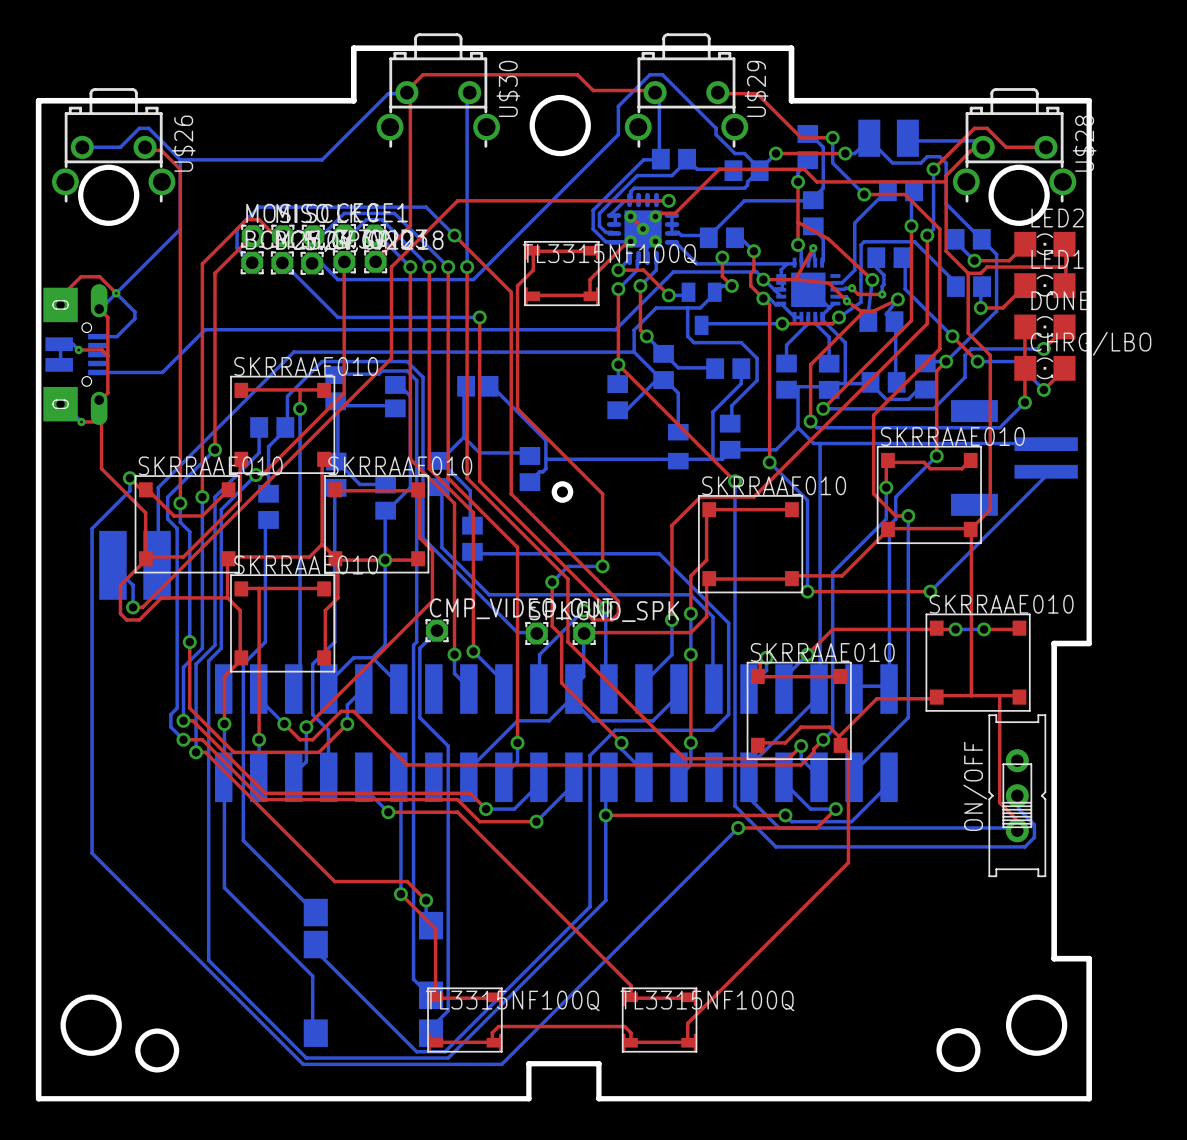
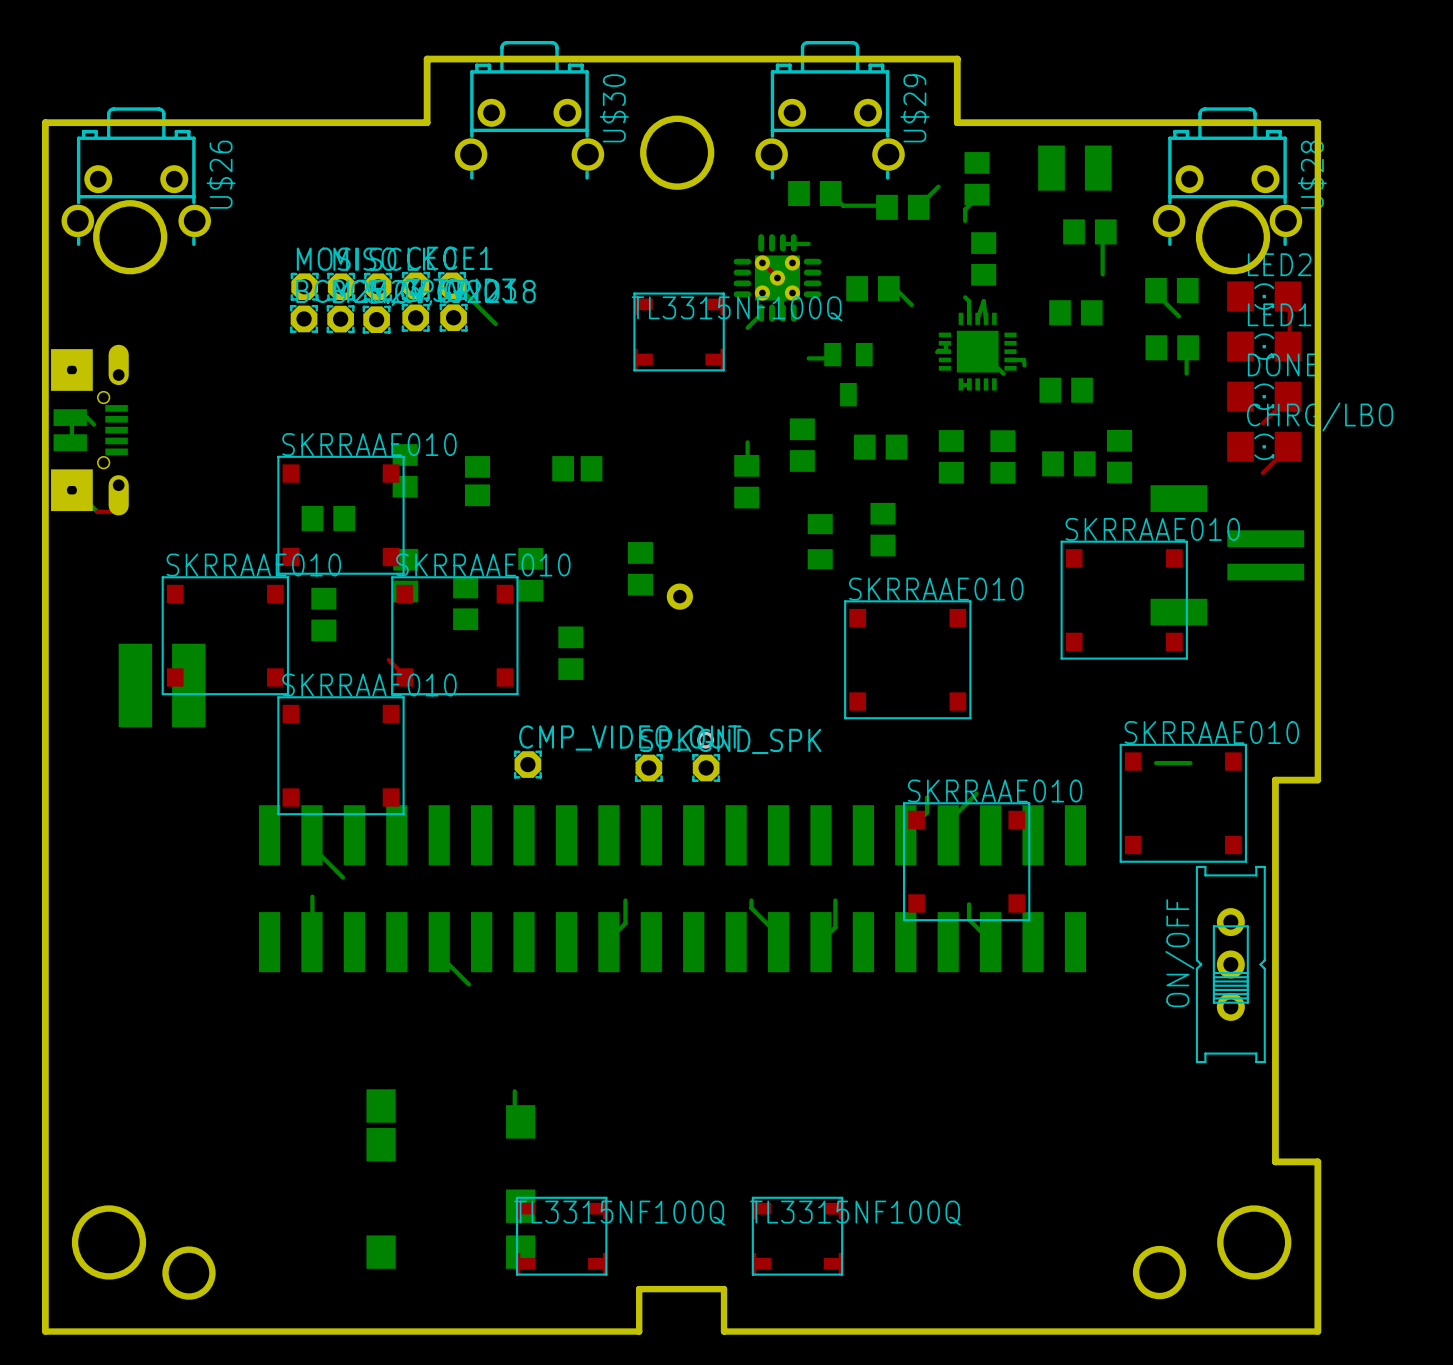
bottom track: (406, 92) (388, 93) (322, 159) (180, 159) -> none
bottom track: (469, 92) (467, 93) (467, 267) -> none
bottom track: (655, 92) (659, 96) (660, 159) (643, 159) (593, 210) (593, 229) (605, 241) (627, 241) (643, 228) -> none
top track: (655, 92) (653, 90) (593, 90) (577, 74) (422, 74) (406, 92) (410, 96) (410, 226) (375, 261) -> none
top track: (717, 92) (757, 93) (801, 137) (832, 137) -> none
bottom track: (807, 133) (823, 147) (823, 188) (813, 200) (744, 200) (708, 237) (706, 235) (671, 233) (671, 213) (656, 213) (643, 228) -> none
bottom track: (832, 137) (832, 163) (864, 194) -> none
via: (832, 137) -> none
bottom track: (907, 138) (908, 140) (974, 140) (983, 147) -> none
bottom track: (82, 147) (120, 147) (139, 128) (148, 128) (180, 159) -> none
top track: (145, 147) (145, 150) (161, 150) (180, 169) (180, 503) -> none
top track: (983, 147) (980, 150) (971, 150) (946, 175) (946, 251) (968, 273) -> none
top track: (1045, 147) (1006, 147) (987, 128) (974, 128) (933, 169) -> none
top track: (775, 153) (845, 153) -> none
via: (775, 153) -> none
bottom track: (845, 153) (854, 153) (869, 138) (892, 163) (920, 163) (927, 156) (939, 156) (946, 163) (946, 203) (996, 254) (996, 311) (946, 361) (927, 361) (925, 363) -> none
via: (845, 153) -> none
bottom track: (180, 159) (180, 229) (99, 309) -> none
bottom track: (687, 159) (671, 175) (637, 175) (599, 213) (599, 226) (605, 232) (614, 233) -> none
bottom track: (933, 169) (933, 229) (927, 235) -> none
via: (933, 169) -> none
top track: (798, 181) (798, 244) -> none
via: (798, 181) -> none
top track: (946, 181) (816, 181) (804, 169) (719, 169) (675, 213) (656, 213) (655, 216) -> none
bottom track: (887, 190) (854, 222) (854, 270) (842, 282) (835, 282) -> none
top track: (864, 194) (905, 194) (939, 229) (939, 348) (873, 415) (873, 493) (895, 515) (908, 515) -> none
via: (864, 194) -> none
top track: (668, 200) (457, 200) (391, 267) (391, 358) (142, 607) (133, 607) -> none
via: (668, 200) -> none
top track: (798, 222) (828, 238) (872, 279) -> none
bottom track: (614, 224) (615, 216) (612, 213) (624, 200) (629, 200) (631, 191) (634, 188) (744, 188) (747, 181) (760, 169) (744, 153) (735, 153) (716, 134) (716, 128) (662, 74) (649, 74) (618, 106) (618, 134) (473, 279) (337, 279) (322, 263) (312, 263) -> none
bottom track: (813, 226) (823, 238) (822, 262) -> none
top track: (911, 226) (911, 320) (823, 408) -> none
via: (911, 226) -> none
bottom track: (344, 235) (347, 232) (353, 232) (366, 219) (382, 219) (429, 267) -> none
bottom track: (454, 235) (426, 207) (259, 207) (237, 229) (237, 248) (252, 262) -> none
top track: (454, 235) (511, 292) (511, 493) (618, 601) (618, 613) (612, 619) (593, 619) (583, 610) -> none
via: (454, 235) -> none
top track: (927, 235) (927, 323) (753, 497) (700, 497) (671, 525) (671, 619) -> none
via: (927, 235) -> none
top track: (252, 236) (214, 273) (214, 449) -> none
top track: (282, 236) (274, 235) (259, 219) (246, 219) (202, 263) (202, 497) -> none
bottom track: (313, 236) (322, 235) (344, 213) (394, 213) (448, 267) -> none
top track: (630, 241) (627, 241) (590, 279) (589, 296) (533, 296) -> none
bottom track: (671, 242) (675, 241) (697, 263) (794, 262) -> none
via: (798, 244) -> none
top track: (1025, 244) (1009, 260) (974, 260) -> none
top track: (813, 248) (795, 279) -> none
via: (813, 248) -> none
top track: (589, 250) (533, 251) (533, 270) (517, 285) (517, 408) (602, 493) (602, 566) -> none
top track: (753, 251) (753, 270) (750, 273) (750, 285) (769, 304) (769, 462) -> none
via: (753, 251) -> none
bottom track: (638, 257) (637, 270) (618, 289) -> none
bottom track: (656, 257) (656, 270) (640, 285) -> none
top track: (722, 257) (722, 276) (731, 285) -> none
via: (722, 257) -> none
bottom track: (876, 257) (876, 267) (883, 275) (882, 294) -> none
bottom track: (902, 257) (905, 260) (905, 289) (952, 336) -> none
via: (974, 260) -> none
top track: (344, 261) (344, 393) (262, 475) (255, 475) -> none
bottom track: (282, 262) (337, 317) (479, 317) -> none
bottom track: (787, 263) (781, 269) (781, 275) -> none
top track: (410, 267) (410, 459) (454, 503) (454, 654) -> none
via: (410, 267) -> none
top track: (429, 267) (429, 468) (473, 512) (473, 651) -> none
via: (429, 267) -> none
top track: (448, 267) (448, 478) (517, 547) (517, 742) -> none
via: (448, 267) -> none
top track: (467, 267) (467, 478) (567, 579) (567, 642) (684, 758) (788, 758) (801, 746) -> none
via: (467, 267) -> none
top track: (1065, 267) (987, 267) (980, 273) (968, 273) -> none
top track: (618, 270) (643, 270) (668, 295) -> none
via: (618, 270) -> none
top track: (968, 273) (968, 333) (990, 355) (990, 509) (970, 529) -> none
top track: (763, 279) (795, 279) -> none
via: (763, 279) -> none
top track: (795, 279) (828, 283) (846, 301) (861, 311) (873, 311) (897, 299) -> none
bottom track: (872, 279) (868, 321) -> none
via: (872, 279) -> none
top track: (640, 285) (640, 330) (646, 336) -> none
via: (640, 285) -> none
bottom track: (731, 285) (722, 285) (700, 307) (656, 307) (634, 330) (634, 352) -> none
via: (731, 285) -> none
top track: (1025, 285) (1002, 307) (980, 307) -> none
bottom track: (955, 286) (958, 285) (914, 241) (864, 241) (861, 244) (860, 302) (839, 317) -> none
bottom track: (852, 288) (835, 289) -> none
top track: (852, 288) (858, 294) (882, 294) -> none
via: (852, 288) -> none
top track: (618, 289) (618, 364) (735, 481) -> none
via: (618, 289) -> none
bottom track: (116, 293) (134, 311) (134, 318) (116, 336) (97, 336) -> none
top track: (116, 293) (99, 276) (80, 276) (60, 297) (60, 304) -> none
via: (116, 293) -> none
via: (882, 294) -> none
via: (668, 295) -> none
bottom track: (781, 296) (756, 271) (673, 271) (615, 329) (205, 329) (162, 372) (97, 372) -> none
bottom track: (763, 298) (769, 298) (775, 304) (781, 303) (794, 316) -> none
via: (763, 298) -> none
bottom track: (897, 299) (886, 314) (895, 323) (896, 382) -> none
via: (897, 299) -> none
via: (846, 301) -> none
bottom track: (835, 303) (822, 316) (823, 320) (845, 342) (845, 383) -> none
bottom track: (687, 307) (687, 336) (694, 342) (741, 342) (757, 358) (757, 380) (731, 405) (730, 423) -> none
via: (980, 307) -> none
top track: (99, 309) (107, 317) (107, 393) (99, 400) (101, 402) (101, 468) (145, 512) (145, 558) -> none
top track: (864, 311) (810, 364) (810, 421) -> none
bottom track: (808, 316) (807, 323) (786, 345) (786, 363) -> none
bottom track: (815, 316) (815, 323) (829, 337) (829, 363) -> none
top track: (479, 317) (479, 481) (605, 607) -> none
via: (479, 317) -> none
top track: (839, 317) (832, 323) (782, 323) -> none
via: (839, 317) -> none
bottom track: (782, 323) (703, 323) (701, 325) -> none
via: (782, 323) -> none
top track: (1025, 326) (1024, 402) -> none
bottom track: (646, 336) (678, 367) (715, 368) -> none
via: (646, 336) -> none
top track: (952, 336) (977, 361) -> none
via: (952, 336) -> none
bottom track: (1043, 348) (971, 348) (965, 355) (965, 377) (933, 408) (823, 408) -> none
via: (1043, 348) -> none
top track: (78, 350) (102, 350) (107, 355) -> none
via: (78, 350) -> none
bottom track: (634, 352) (663, 380) -> none
bottom track: (634, 352) (293, 352) (158, 487) (157, 565) -> none
top track: (946, 361) (936, 371) (936, 456) -> none
via: (946, 361) -> none
bottom track: (977, 361) (1015, 361) (1043, 389) -> none
via: (977, 361) -> none
via: (618, 364) -> none
bottom track: (741, 368) (741, 383) (712, 411) (712, 459) -> none
bottom track: (335, 375) (378, 374) (382, 371) (407, 371) (416, 380) (416, 642) (413, 645) (413, 979) (431, 995) -> none
bottom track: (663, 380) (678, 393) (678, 432) -> none
bottom track: (663, 380) (659, 377) (627, 408) (617, 410) -> none
bottom track: (395, 384) (397, 383) (410, 396) (410, 487) (385, 510) (385, 645) (372, 657) -> none
bottom track: (466, 386) (463, 386) (463, 437) -> none
bottom track: (489, 386) (492, 386) (545, 440) (545, 468) (539, 471) (529, 482) -> none
bottom track: (798, 386) (798, 427) -> none
top track: (300, 389) (300, 408) -> none
bottom track: (925, 389) (917, 389) (908, 399) (886, 399) (870, 382) (832, 383) (829, 389) (826, 386) (788, 386) (786, 389) -> none
via: (1043, 389) -> none
top track: (241, 390) (324, 390) -> none
bottom track: (1024, 402) (999, 427) (816, 427) (810, 421) -> none
via: (1024, 402) -> none
bottom track: (300, 408) (300, 679) (293, 686) (293, 689) -> none
via: (300, 408) -> none
bottom track: (395, 408) (394, 405) (337, 405) (335, 401) (337, 402) (337, 459) (336, 461) (359, 484) (385, 484) -> none
via: (823, 408) -> none
via: (81, 421) -> none
via: (810, 421) -> none
bottom track: (259, 427) (259, 452) (214, 497) (214, 645) (196, 664) (196, 752) -> none
bottom track: (798, 427) (813, 443) (1046, 444) -> none
bottom track: (798, 427) (775, 449) (730, 449) (722, 459) (681, 459) (678, 461) (678, 459) (545, 459) -> none
bottom track: (463, 437) (439, 460) (470, 490) (470, 525) (472, 525) -> none
bottom track: (463, 437) (479, 452) (526, 452) (529, 455) -> none
bottom track: (820, 443) (820, 686) (816, 689) (816, 698) (750, 764) (748, 777) (750, 777) (750, 799) (779, 827) (1015, 827) (1017, 830) -> none
bottom track: (214, 449) (167, 497) (167, 519) (177, 528) (177, 708) (170, 714) (170, 727) (183, 739) -> none
via: (214, 449) -> none
bottom track: (936, 456) (895, 497) (895, 519) (889, 525) (889, 689) (886, 686) (854, 686) (854, 689) -> none
via: (936, 456) -> none
top track: (241, 459) (240, 500) (183, 556) (148, 556) (145, 558) -> none
top track: (324, 459) (322, 462) (322, 544) (309, 556) (230, 556) (227, 560) (227, 597) -> none
top track: (970, 460) (961, 468) (930, 468) (924, 462) (889, 462) (887, 460) (886, 462) (886, 487) -> none
bottom track: (769, 462) (807, 500) (807, 591) -> none
via: (769, 462) -> none
bottom track: (1046, 471) (1043, 471) (1043, 478) (930, 591) -> none
bottom track: (255, 475) (221, 509) (221, 648) (208, 660) (208, 960) (306, 1058) (448, 1058) (605, 900) (605, 777) (608, 777) -> none
via: (255, 475) -> none
bottom track: (129, 478) (129, 490) (92, 528) (92, 853) (303, 1064) (501, 1064) (738, 827) -> none
top track: (129, 478) (139, 487) (145, 487) (174, 515) (202, 515) (228, 489) -> none
via: (129, 478) -> none
bottom track: (735, 481) (735, 805) (775, 846) (1024, 846) (1034, 837) (1034, 824) (1018, 809) (1017, 795) -> none
via: (735, 481) -> none
bottom track: (336, 487) (334, 642) (312, 664) (312, 714) (328, 730) (328, 777) -> none
bottom track: (439, 487) (441, 487) (441, 547) (489, 594) (690, 594) (712, 616) (713, 689) -> none
bottom track: (886, 487) (886, 519) (832, 572) (832, 730) (823, 739) -> none
via: (886, 487) -> none
top track: (335, 489) (419, 490) (419, 538) (432, 550) (432, 601) (306, 727) -> none
bottom track: (268, 493) (268, 446) (287, 427) (285, 427) (287, 424) (287, 396) (322, 361) (407, 361) (422, 377) (422, 538) (517, 632) (536, 633) -> none
bottom track: (202, 497) (202, 648) (183, 667) (183, 720) -> none
via: (202, 497) -> none
bottom track: (180, 503) (180, 522) (189, 531) (189, 642) -> none
via: (180, 503) -> none
top track: (791, 509) (709, 509) (706, 512) (706, 560) (690, 575) (690, 613) -> none
bottom track: (908, 515) (908, 717) (851, 774) (854, 777) -> none
via: (908, 515) -> none
bottom track: (268, 519) (265, 522) (265, 642) (243, 664) (243, 840) (315, 912) -> none
top track: (970, 529) (889, 528) (842, 575) (794, 575) (791, 579) (706, 579) (706, 616) (690, 632) (584, 633) -> none
top track: (970, 529) (971, 695) -> none
bottom track: (472, 551) (473, 553) (659, 553) (728, 623) (728, 714) (712, 730) (615, 730) (590, 755) (590, 906) (445, 1051) (416, 1051) (315, 950) (315, 944) -> none
top track: (145, 558) (120, 585) (120, 613) (126, 619) (139, 619) (161, 597) (227, 597) -> none
top track: (418, 558) (337, 560) (337, 597) (325, 610) (324, 657) -> none
via: (385, 560) -> none
bottom track: (112, 565) (133, 585) (133, 607) -> none
bottom track: (602, 566) (567, 566) (552, 582) -> none
via: (602, 566) -> none
top track: (552, 582) (552, 626) (561, 635) (561, 683) (621, 742) -> none
via: (552, 582) -> none
top track: (241, 588) (324, 588) -> none
top track: (259, 588) (259, 739) -> none
top track: (807, 591) (930, 591) -> none
via: (807, 591) -> none
via: (930, 591) -> none
top track: (227, 597) (240, 610) (241, 657) (224, 676) (224, 723) -> none
via: (133, 607) -> none
bottom track: (605, 607) (605, 686) (608, 689) -> none
via: (605, 607) -> none
bottom track: (583, 610) (539, 654) (538, 689) -> none
bottom track: (690, 613) (690, 654) -> none
via: (690, 613) -> none
bottom track: (671, 619) (671, 654) (646, 679) (646, 686) (643, 689) -> none
via: (671, 619) -> none
top track: (1019, 628) (983, 629) -> none
top track: (955, 629) (832, 629) (807, 654) -> none
via: (955, 629) -> none
via: (983, 629) -> none
bottom track: (437, 630) (419, 648) (419, 717) (448, 746) (448, 1010) (432, 1026) (431, 1033) -> none
bottom track: (584, 633) (583, 676) (574, 686) (573, 689) -> none
top track: (189, 642) (189, 708) (233, 752) (318, 752) (347, 723) -> none
via: (189, 642) -> none
bottom track: (473, 651) (501, 679) (503, 689) -> none
via: (473, 651) -> none
bottom track: (454, 654) (454, 673) (468, 689) -> none
via: (454, 654) -> none
top track: (690, 654) (690, 742) -> none
via: (690, 654) -> none
via: (807, 654) -> none
bottom track: (372, 657) (353, 657) (331, 679) (331, 686) (328, 689) -> none
bottom track: (372, 657) (400, 686) (398, 689) -> none
top track: (766, 657) (760, 664) (760, 673) (757, 676) (840, 676) -> none
via: (766, 657) -> none
bottom track: (363, 689) (347, 705) (347, 723) -> none
bottom track: (678, 689) (678, 695) (653, 720) (593, 720) (571, 698) -> none
top track: (999, 695) (999, 802) (1015, 818) (1017, 830) -> none
top track: (1019, 697) (939, 695) (936, 698) (876, 698) (839, 736) -> none
bottom track: (571, 698) (549, 720) (517, 720) (470, 768) (468, 777) -> none
top track: (183, 720) (192, 720) (265, 793) (470, 793) (486, 809) -> none
via: (183, 720) -> none
bottom track: (224, 723) (224, 887) (312, 976) (312, 1032) (315, 1033) -> none
via: (224, 723) -> none
top track: (284, 723) (300, 739) (312, 739) (341, 711) (353, 711) (407, 764) (801, 764) (823, 739) -> none
via: (284, 723) -> none
via: (347, 723) -> none
bottom track: (306, 727) (306, 761) (293, 774) (293, 777) -> none
via: (306, 727) -> none
top track: (839, 736) (829, 727) (801, 727) (785, 742) (760, 742) (757, 745) -> none
top track: (839, 736) (839, 742) (848, 752) (848, 862) (687, 1023) (687, 1042) (631, 1042) (631, 1032) (624, 1026) (498, 1026) (492, 1032) (492, 1042) -> none
top track: (183, 739) (202, 739) (262, 799) (457, 799) (479, 821) (536, 821) -> none
via: (183, 739) -> none
via: (259, 739) -> none
via: (823, 739) -> none
via: (517, 742) -> none
via: (621, 742) -> none
via: (690, 742) -> none
via: (801, 746) -> none
top track: (196, 752) (205, 752) (334, 881) (407, 881) (426, 900) -> none
via: (196, 752) -> none
bottom track: (398, 777) (400, 777) (400, 894) -> none
bottom track: (538, 777) (536, 777) (536, 787) (514, 809) (486, 809) -> none
bottom track: (573, 777) (571, 777) (571, 787) (536, 821) -> none
bottom track: (784, 777) (785, 783) (810, 809) (835, 809) -> none
bottom track: (889, 777) (886, 777) (886, 787) (851, 821) (791, 821) (785, 815) -> none
via: (486, 809) -> none
top track: (835, 809) (816, 827) (738, 827) -> none
via: (835, 809) -> none
top track: (388, 812) (457, 812) (631, 985) (631, 997) (687, 997) -> none
via: (388, 812) -> none
top track: (605, 815) (785, 815) -> none
via: (605, 815) -> none
via: (785, 815) -> none
via: (536, 821) -> none
via: (738, 827) -> none
top track: (400, 894) (435, 928) (437, 997) (492, 997) -> none
via: (400, 894) -> none
via: (426, 900) -> none
top track: (492, 1042) (437, 1042) -> none

